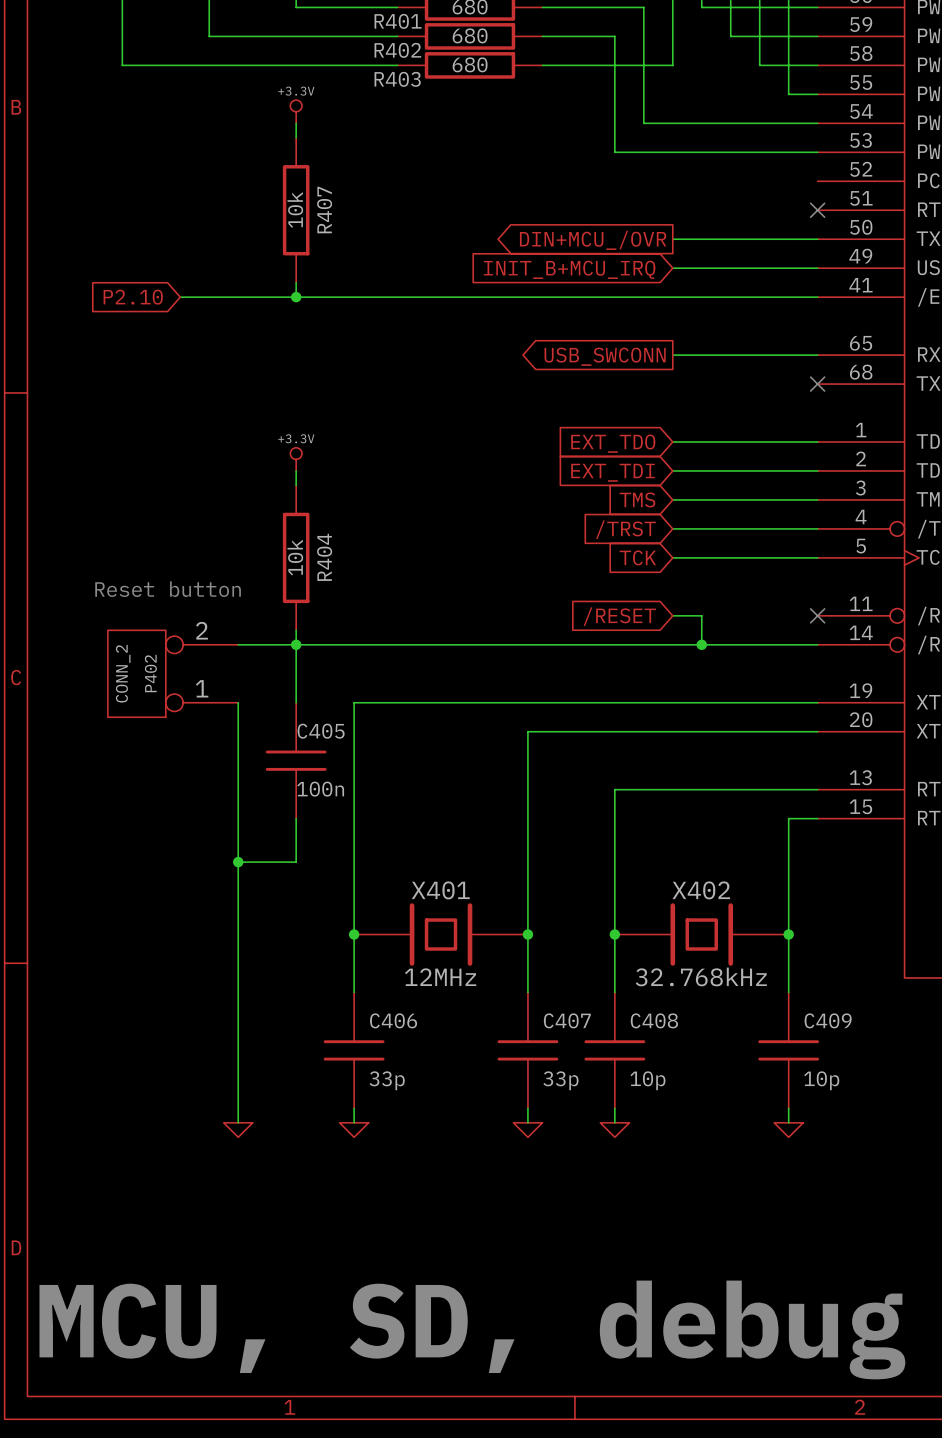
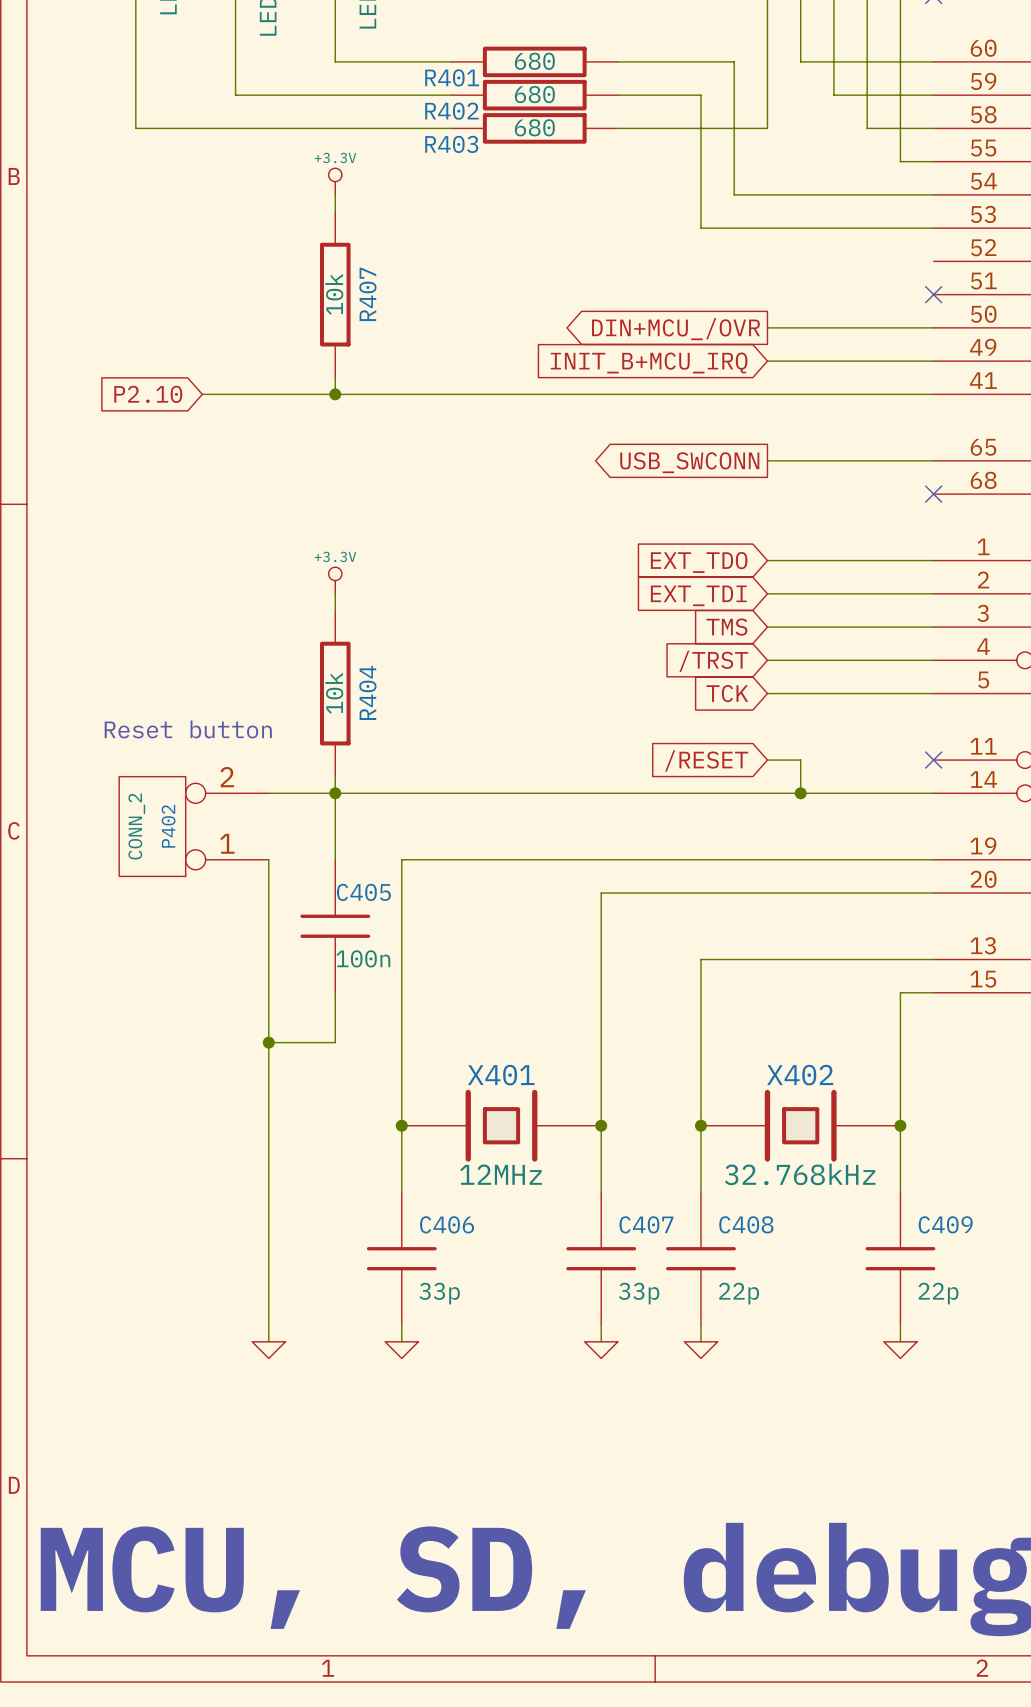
C408 value: 10p (647, 1080) -> 22p (739, 1293)
C409 value: 10p (821, 1080) -> 22p (938, 1293)

